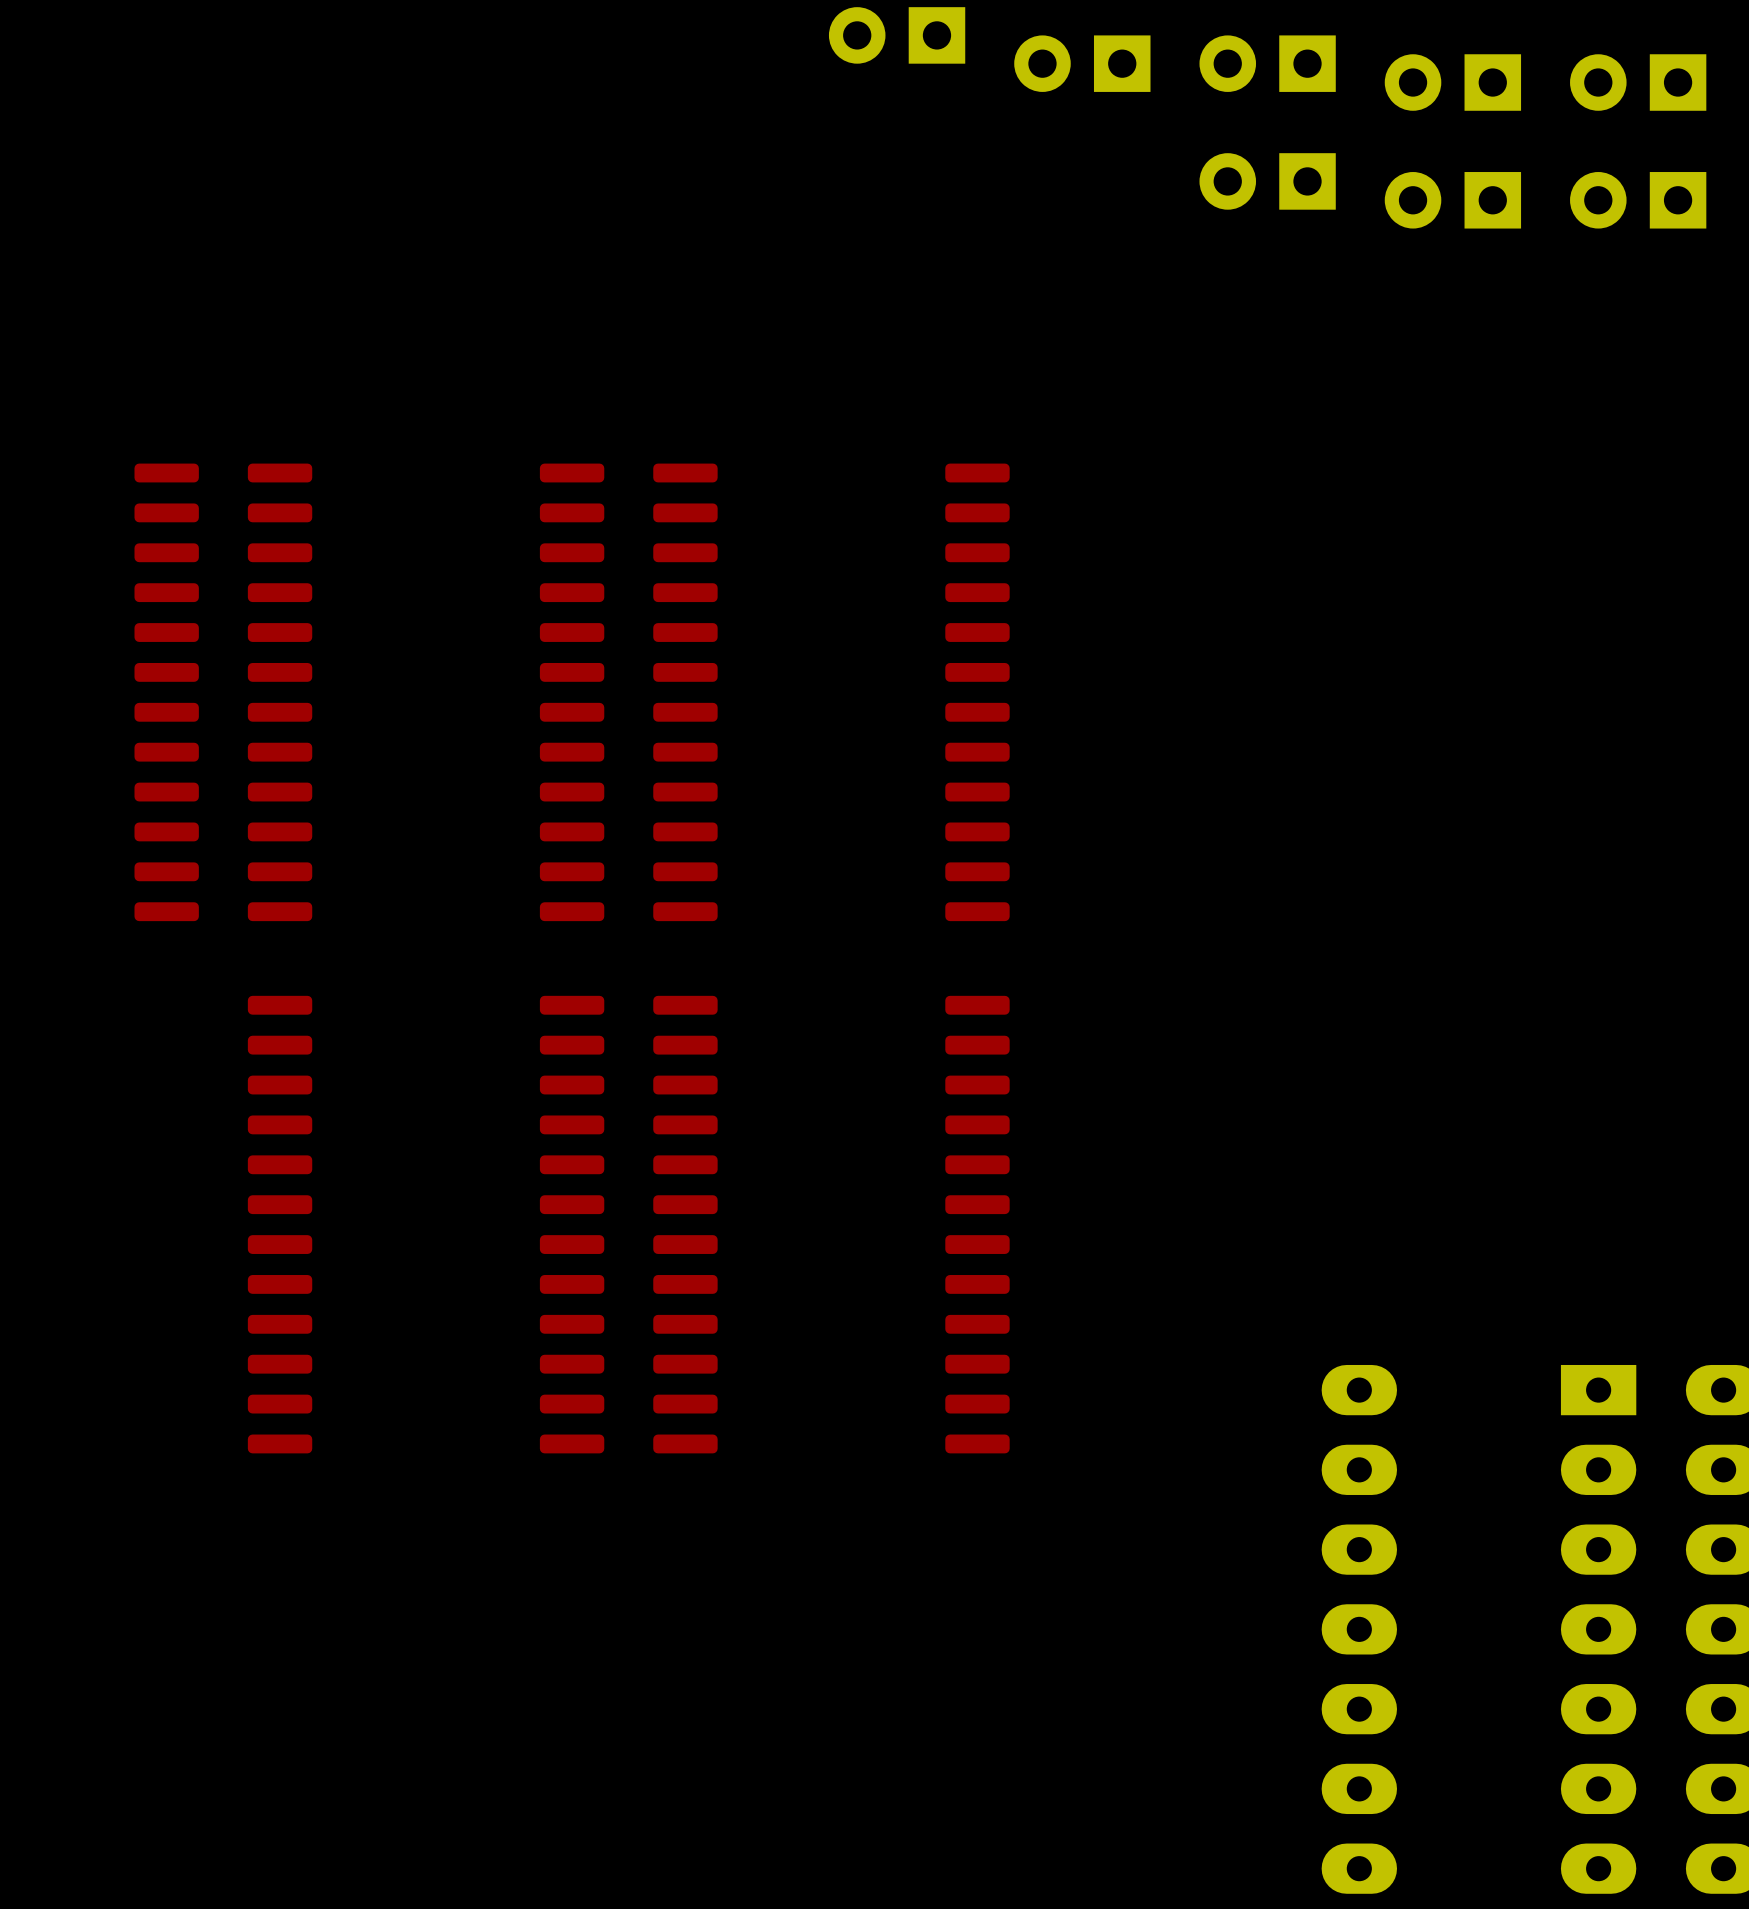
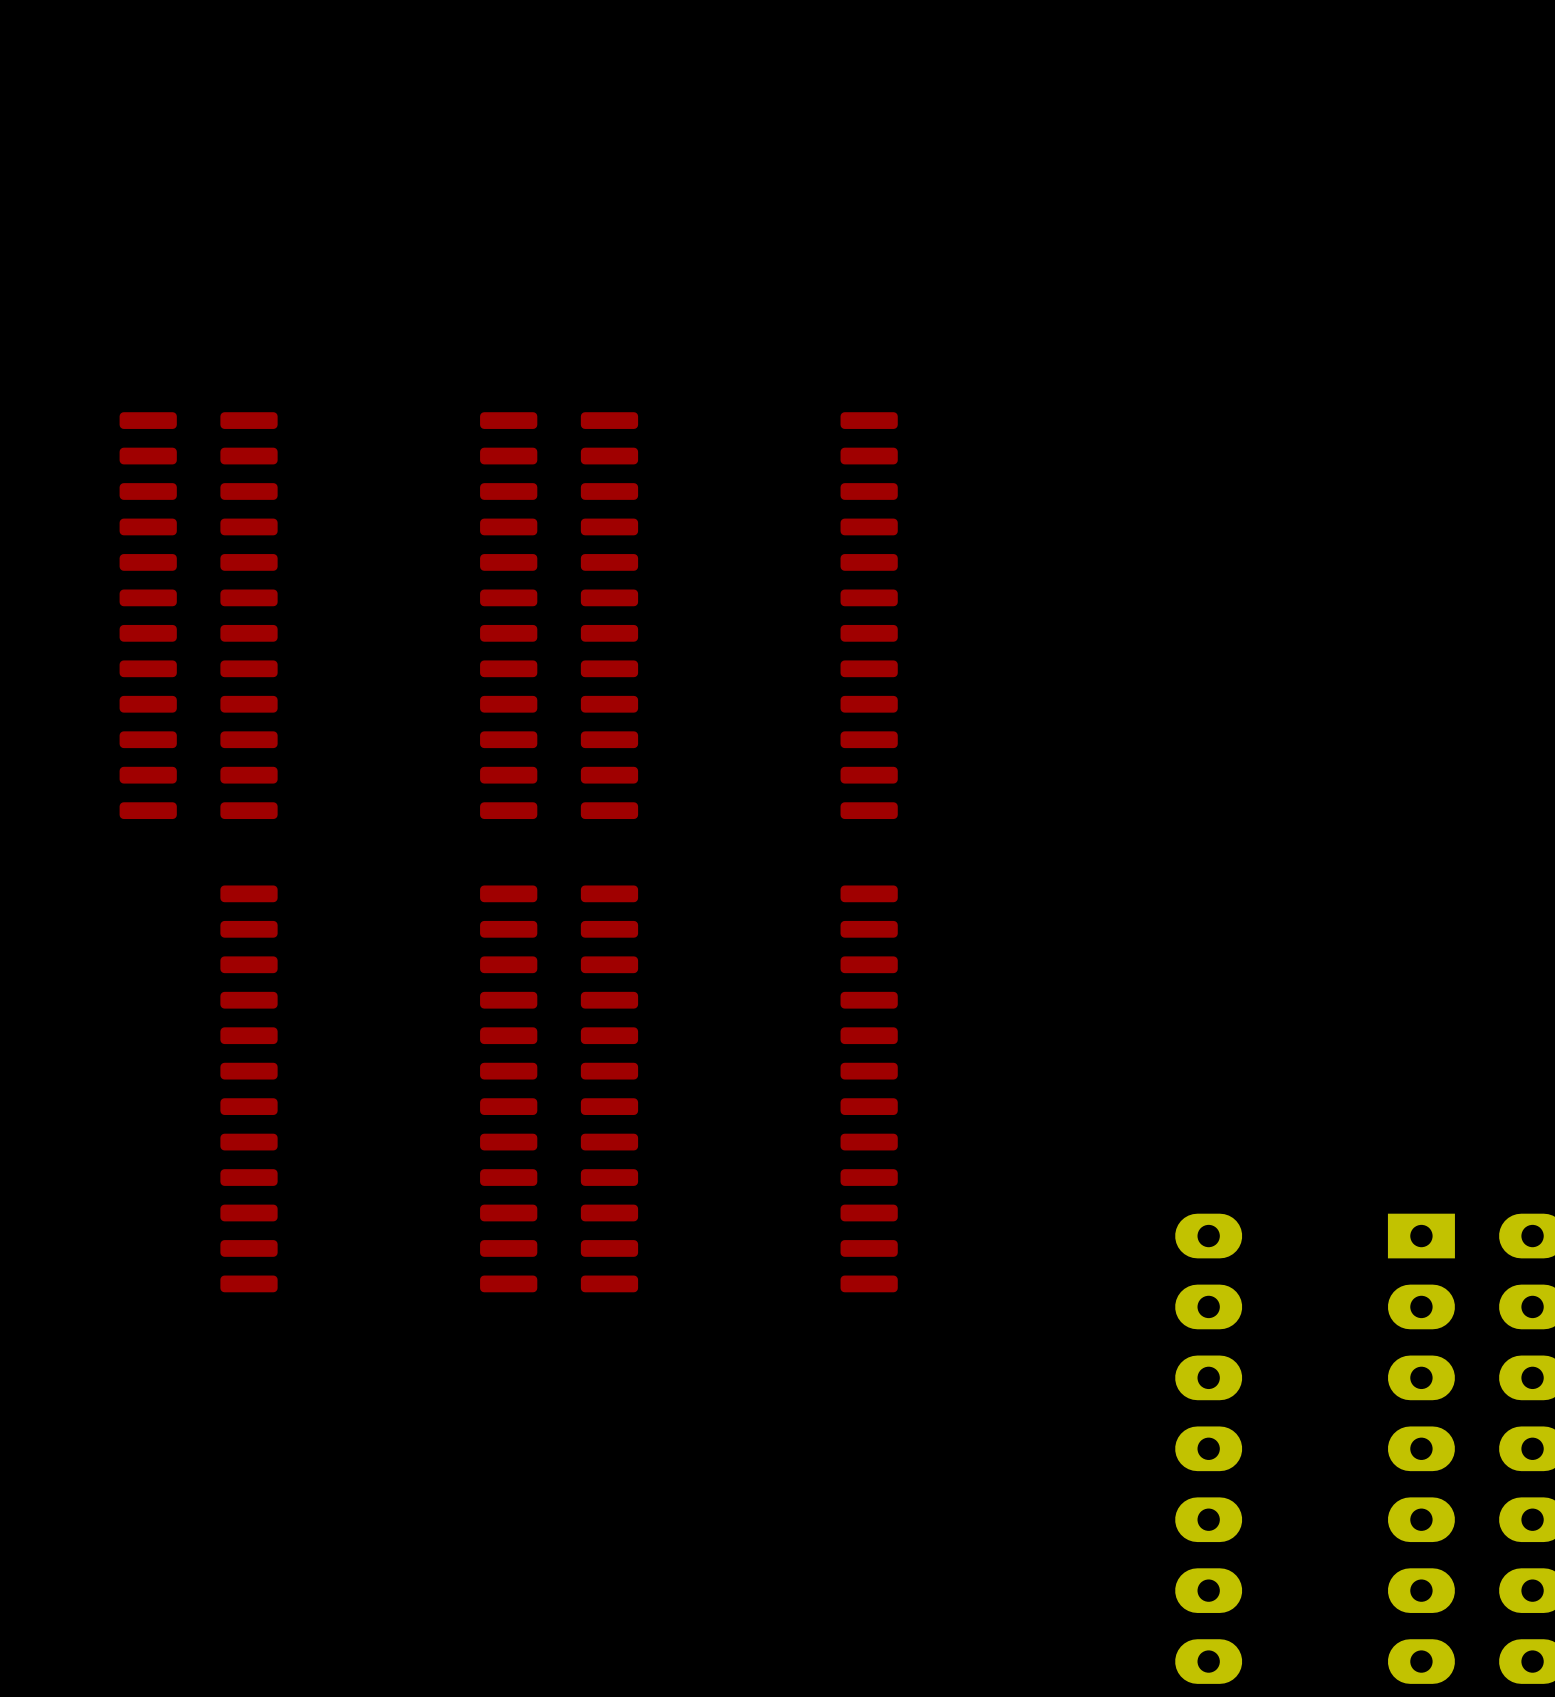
part: (897, 35) -> none
part: (1082, 63) -> none
part: (1267, 63) -> none
part: (1452, 82) -> none
part: (1638, 82) -> none
part: (1267, 181) -> none
part: (1452, 200) -> none
part: (1638, 200) -> none

